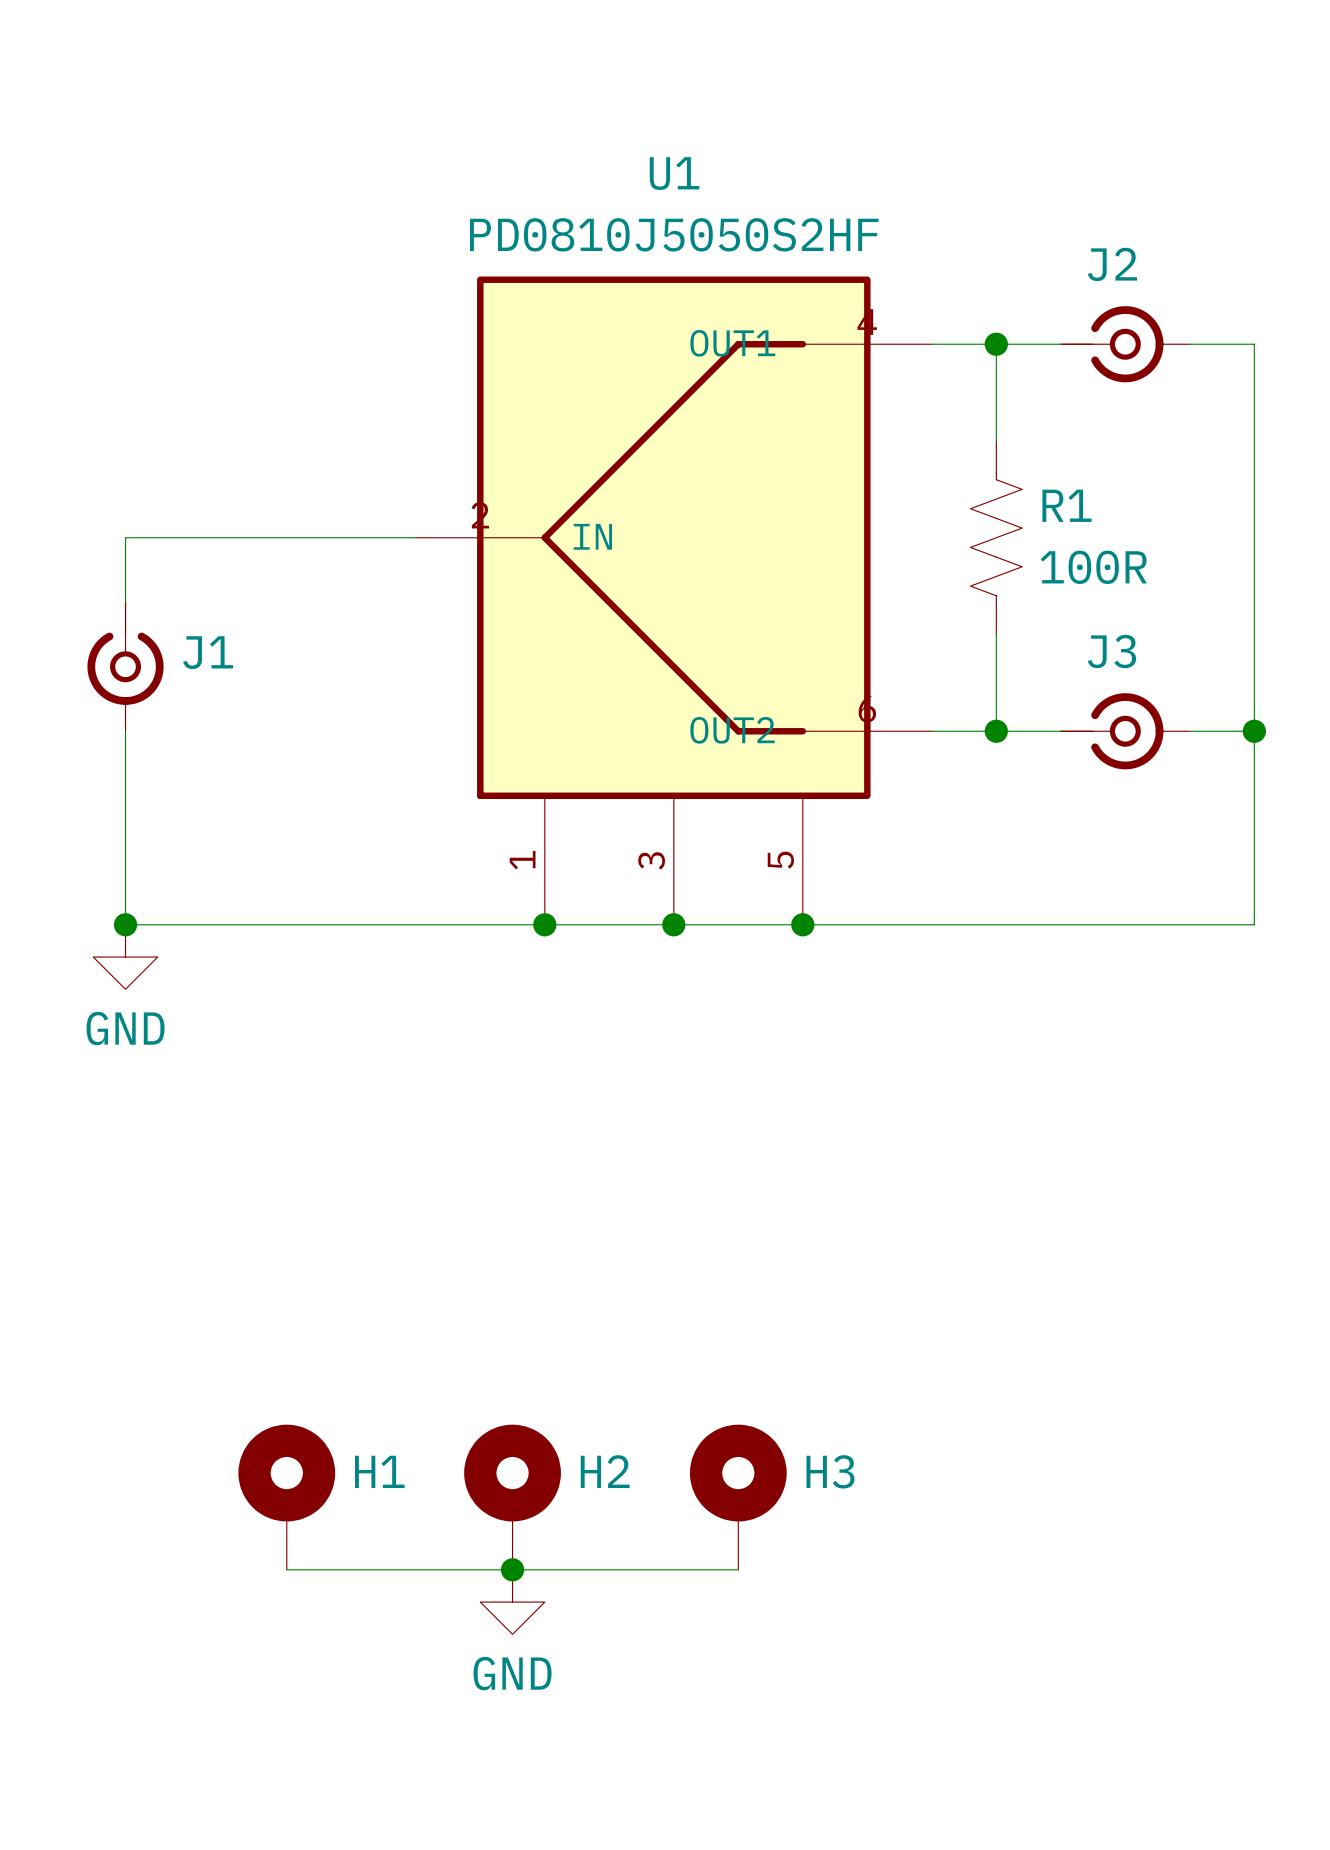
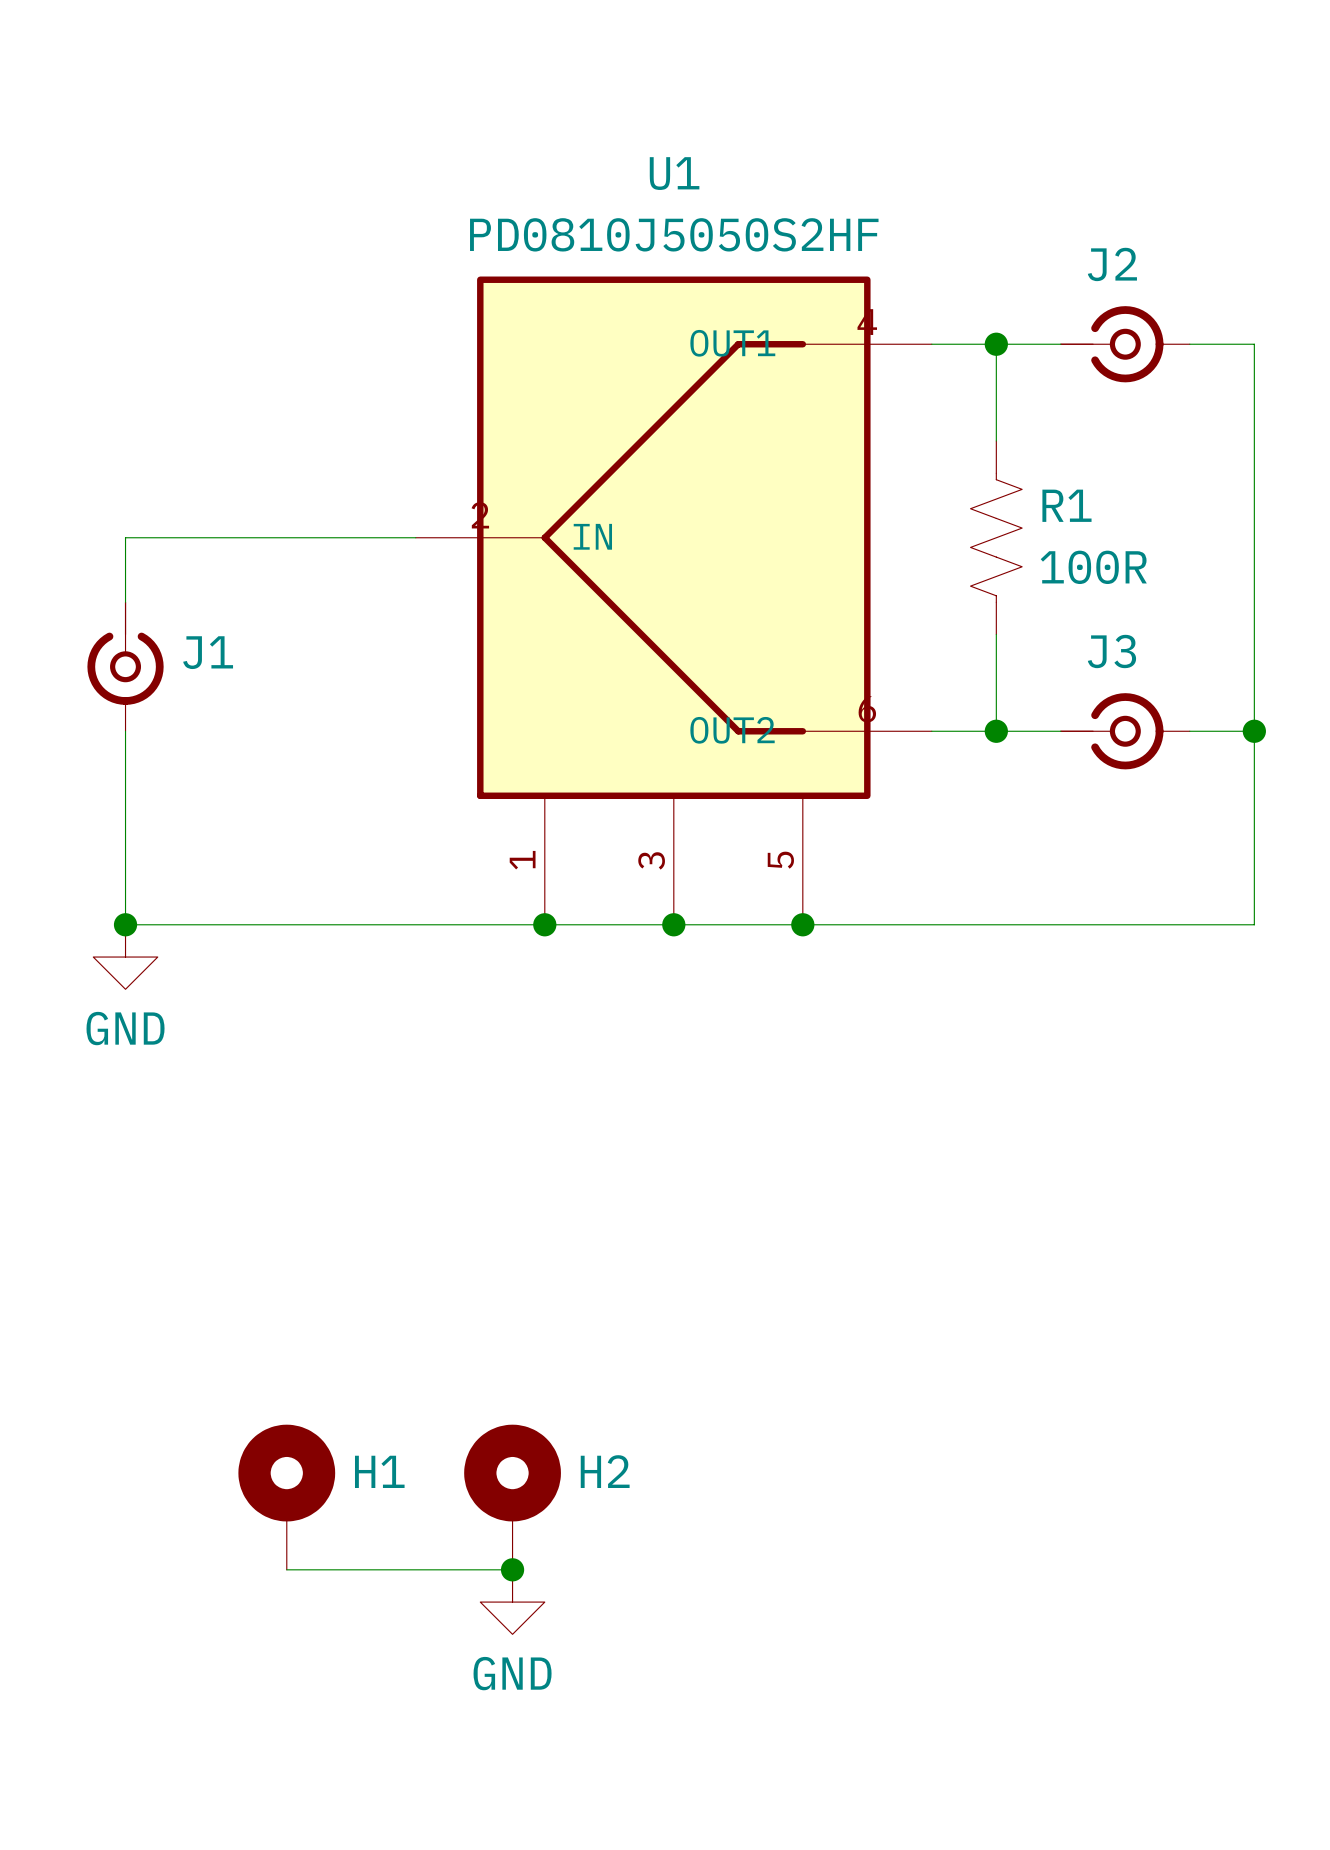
H3: (738, 1497) -> none
wire: (512, 1569) (738, 1569) -> none

